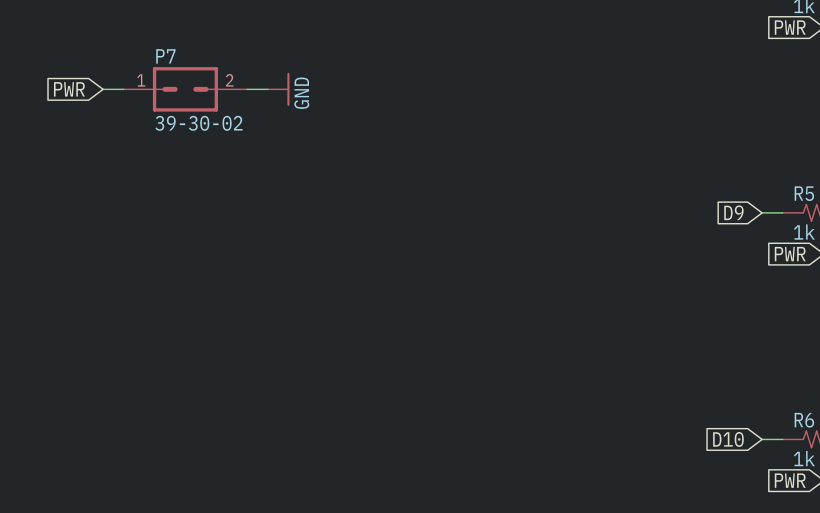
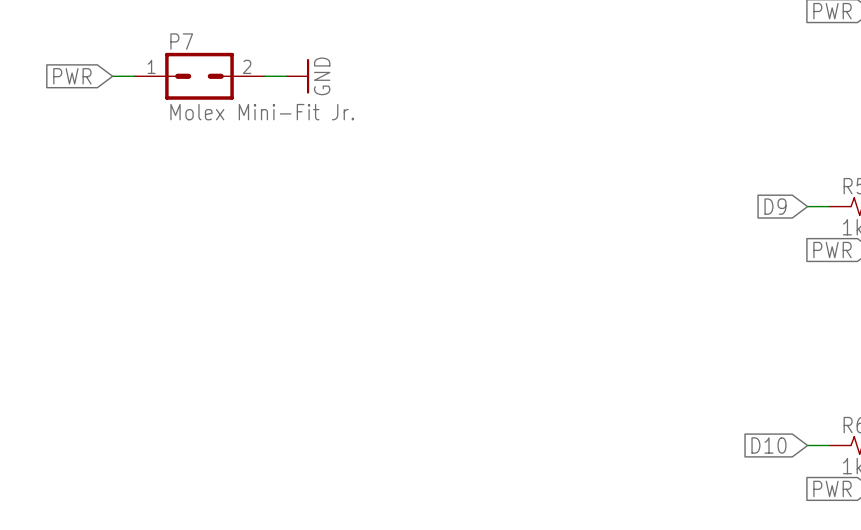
P7 value: 39-30-02 (199, 123) -> Molex Mini-Fit Jr. (262, 112)

